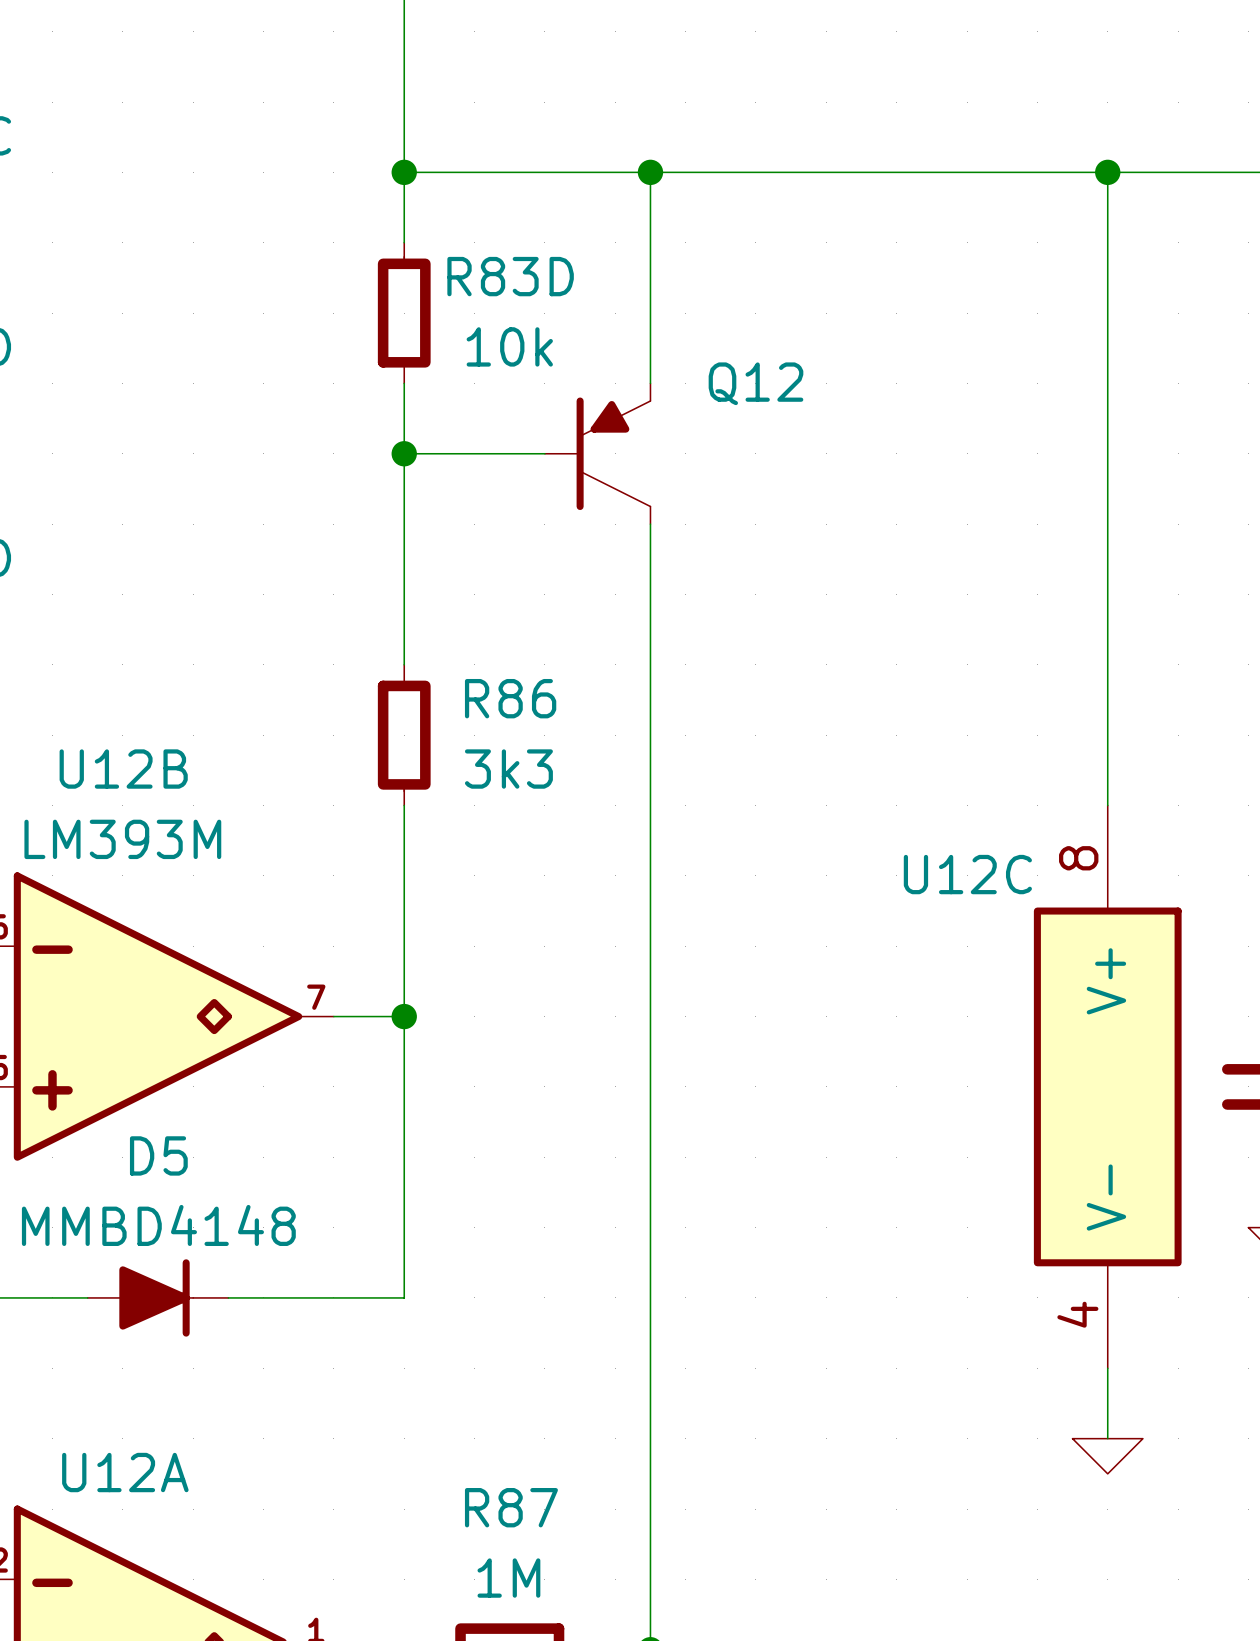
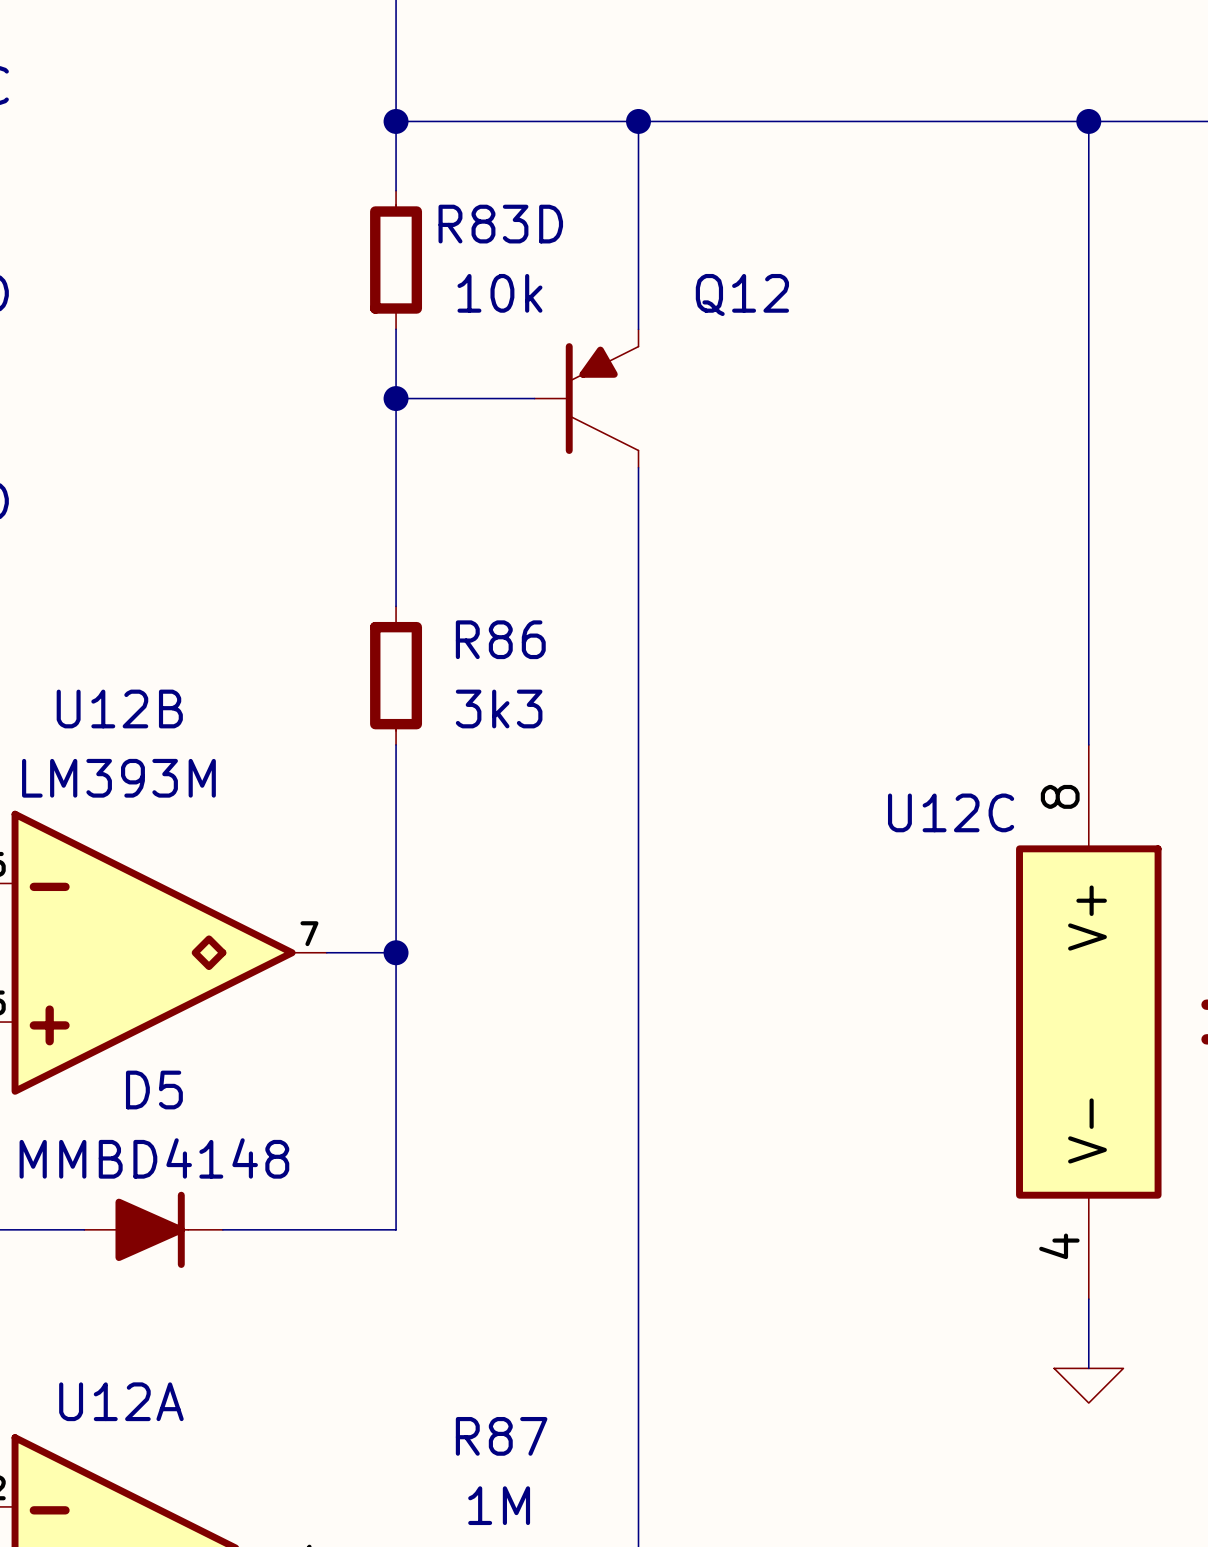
Q12 name position: Q12 (755, 383) -> Q12 (742, 295)

